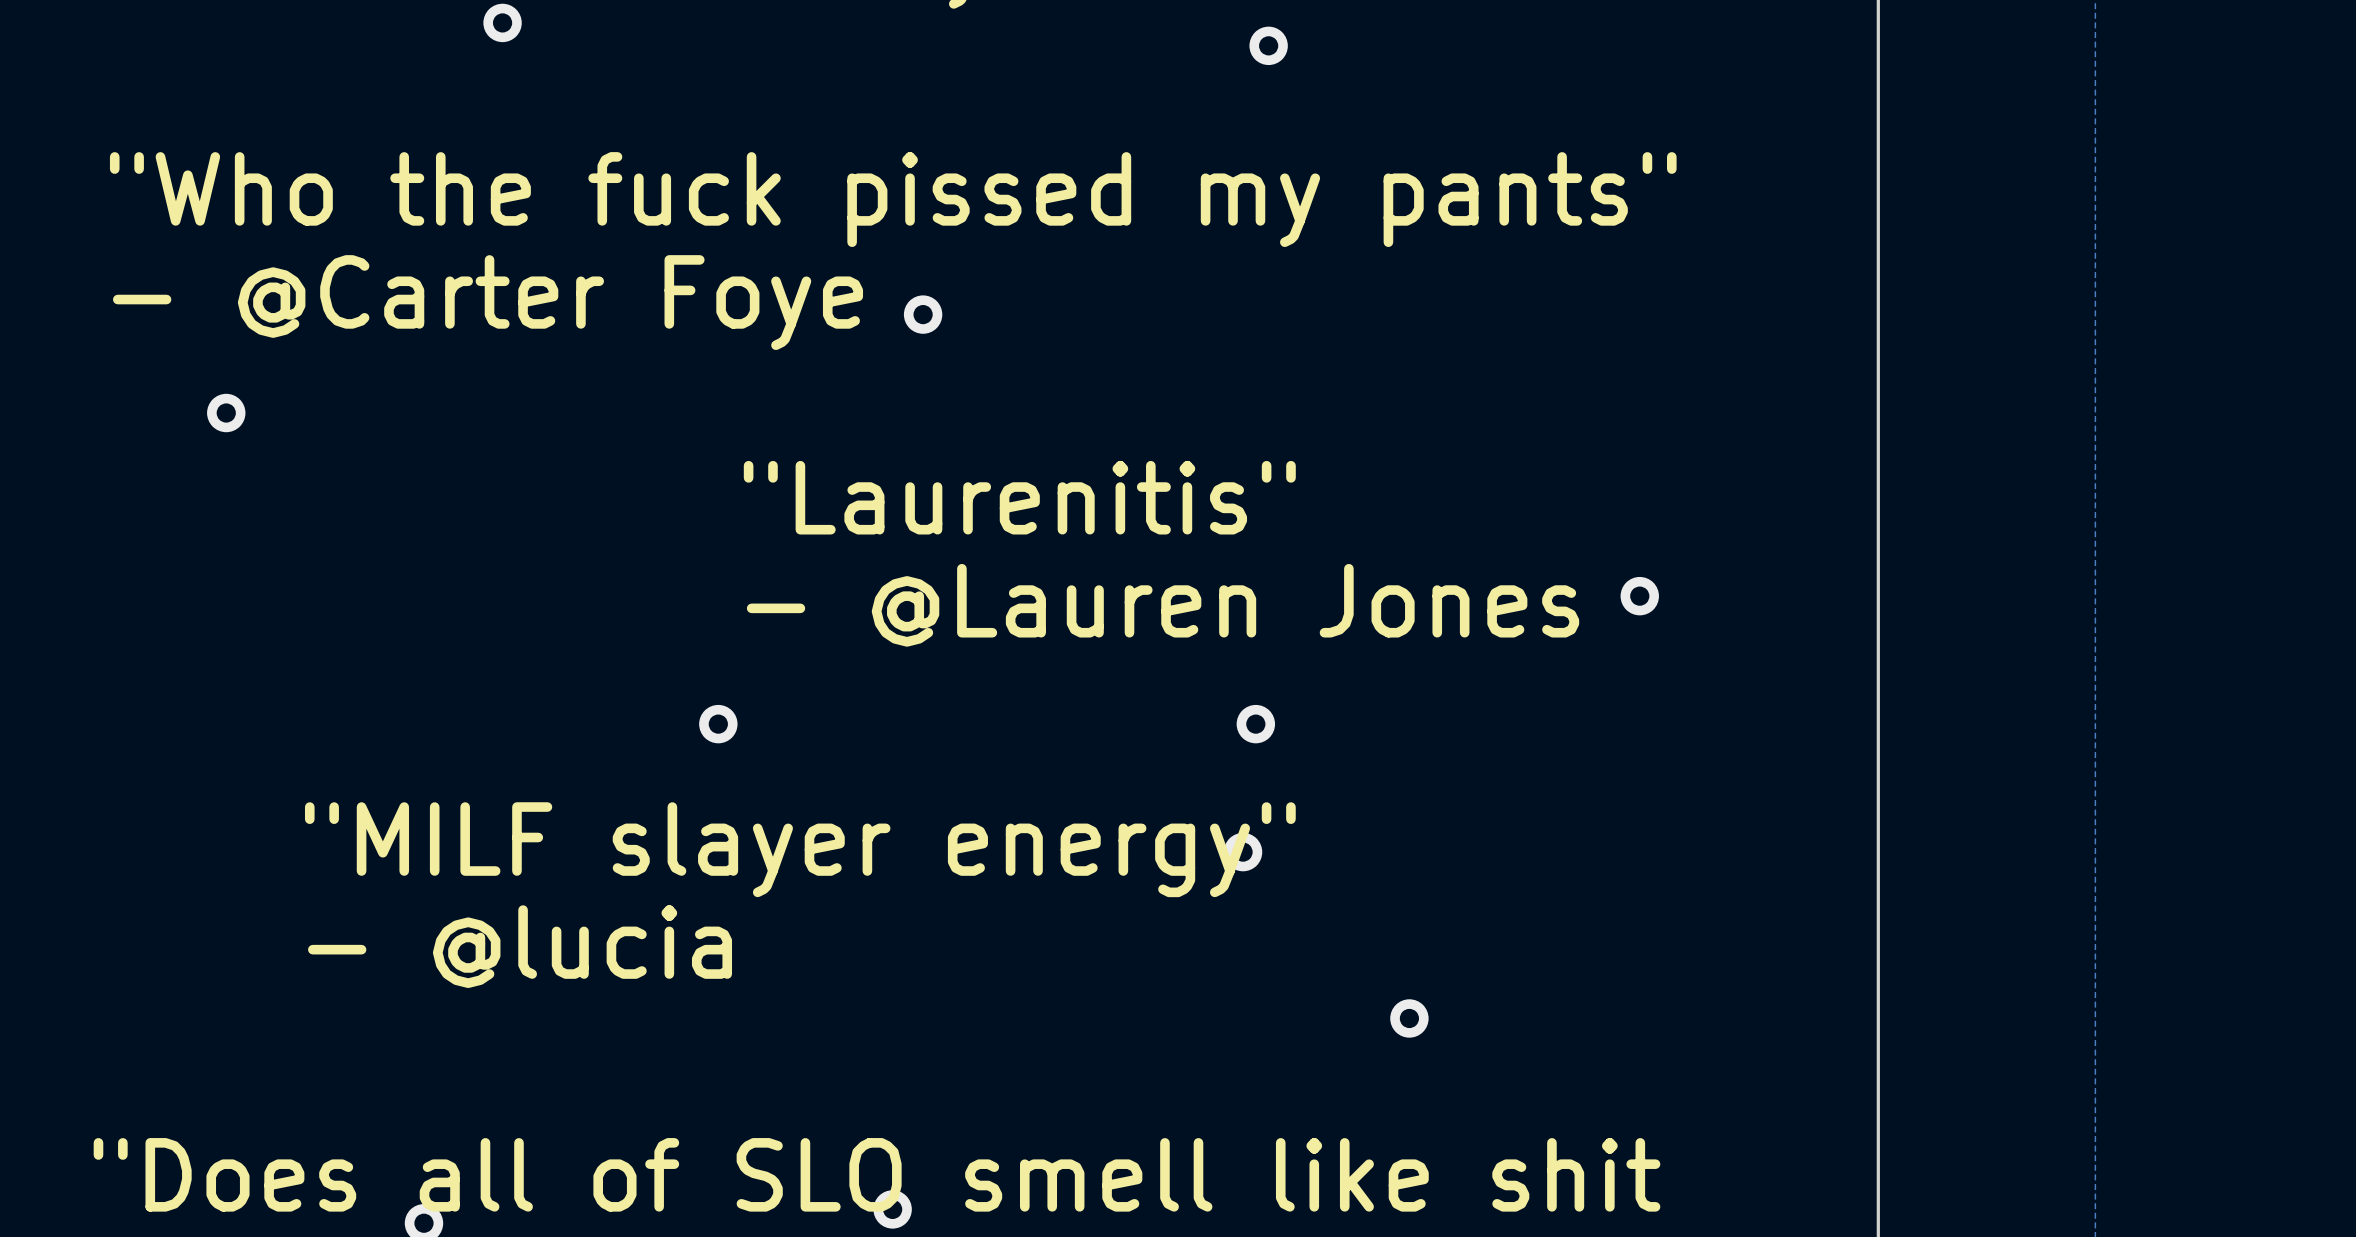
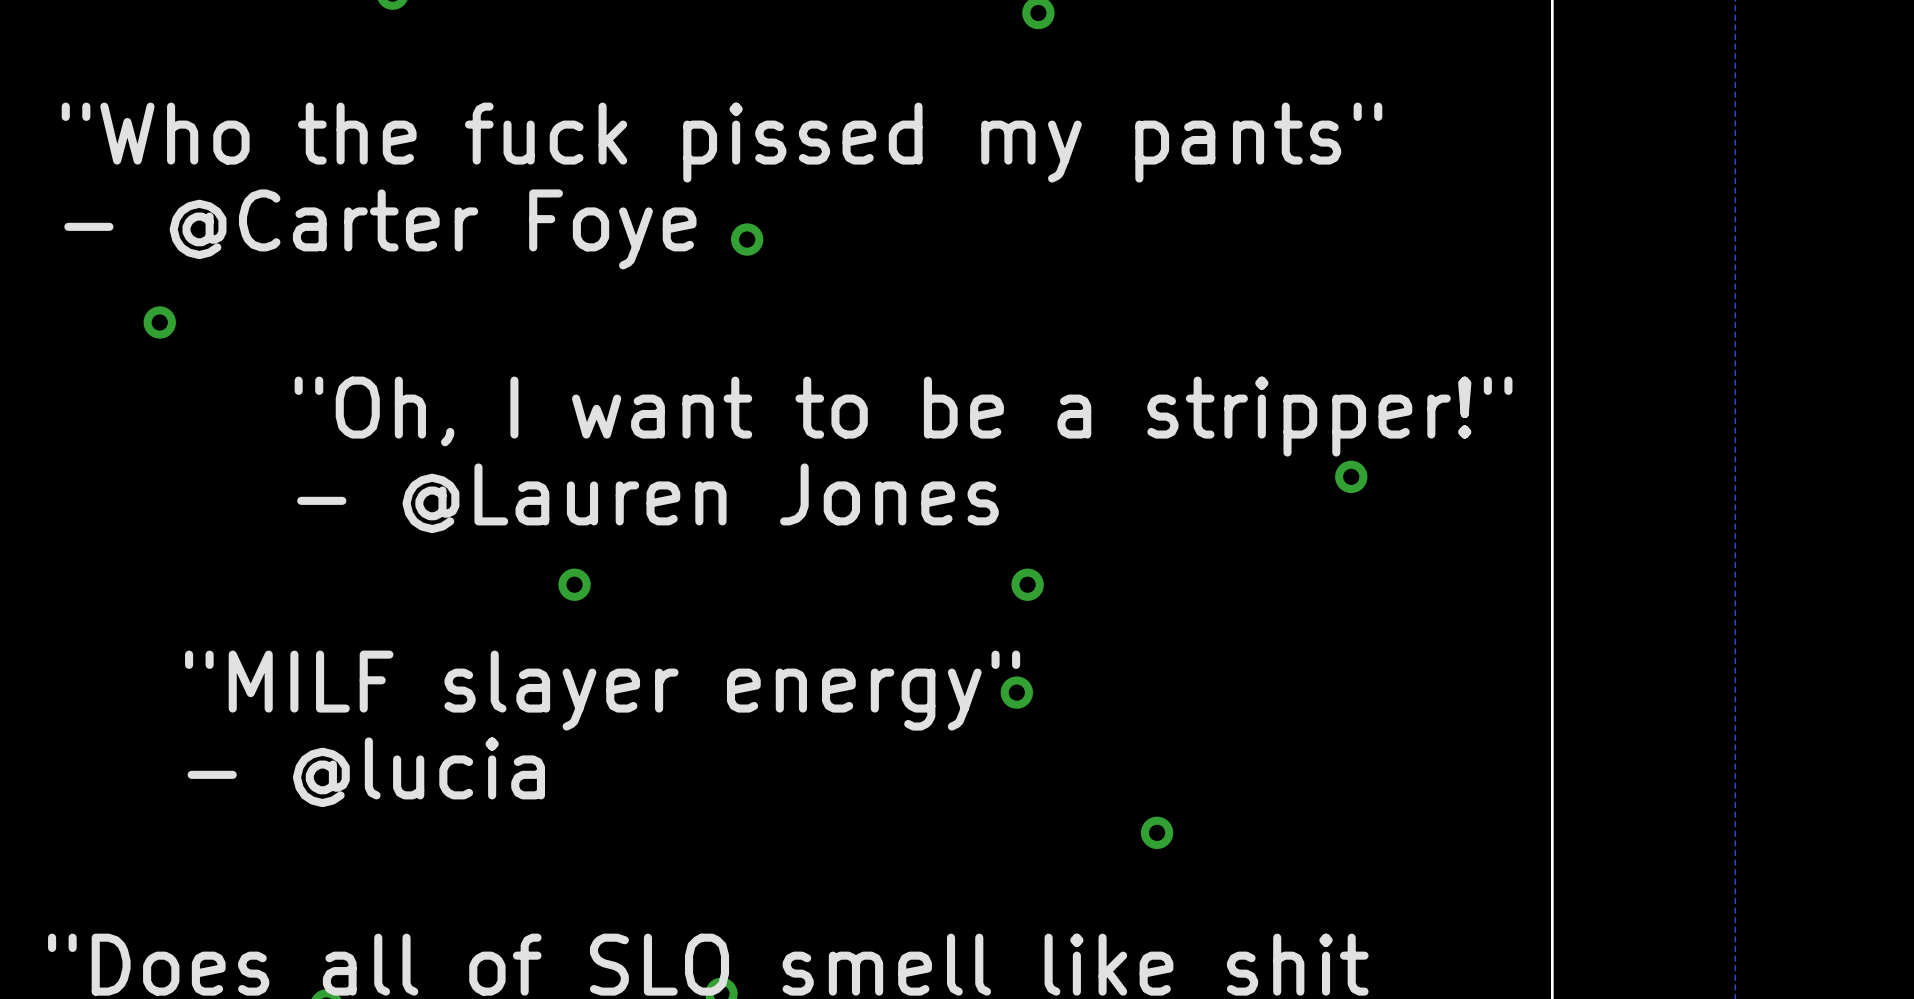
text: "Laurenitis" (1019, 497) -> none
text: none -> "Oh, I want to be a stripper!" (903, 416)
text position: - @Lauren Jones (1163, 605) -> - @Lauren Jones (647, 498)
text position: "MILF slayer energy" (800, 849) -> "MILF slayer energy" (602, 690)
text position: - @lucia (520, 946) -> - @lucia (366, 772)

